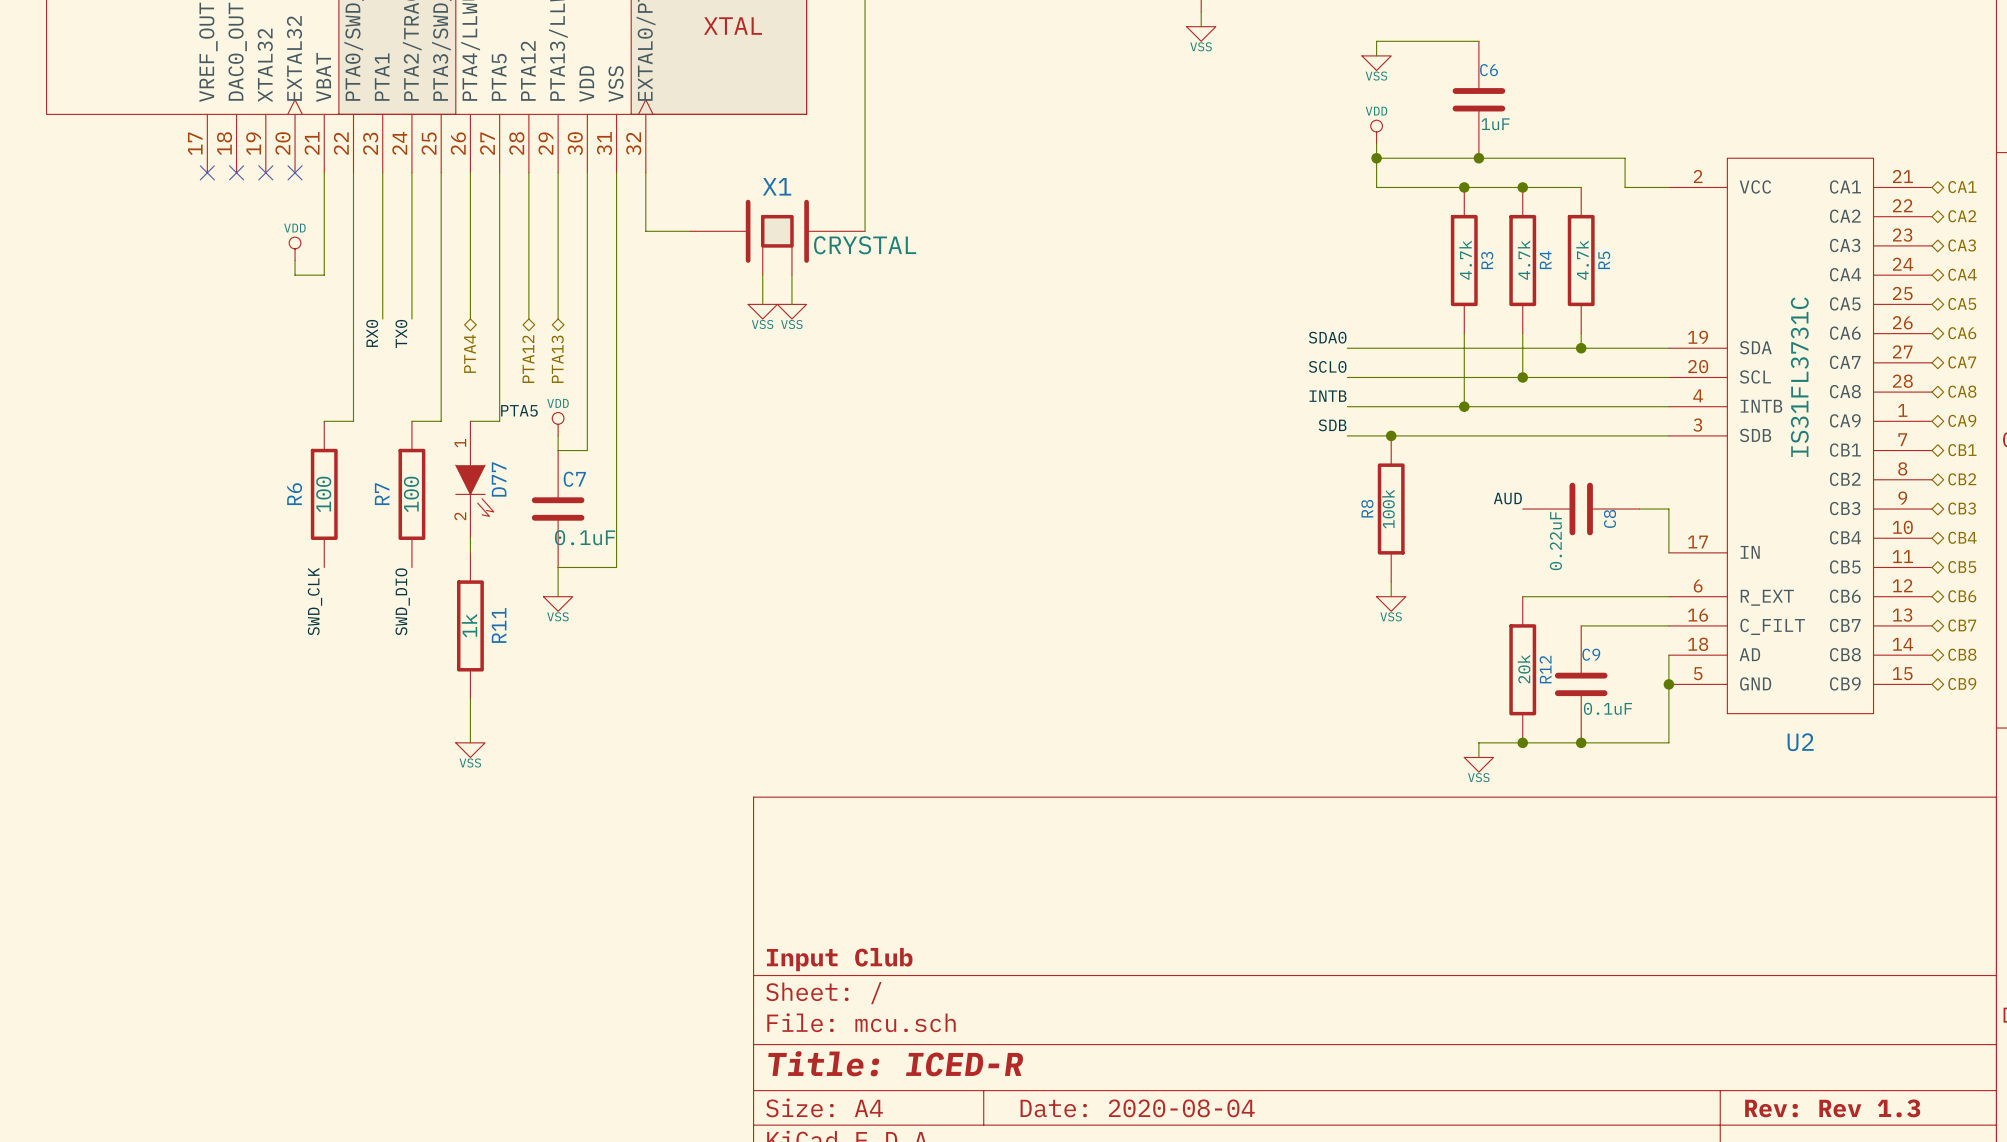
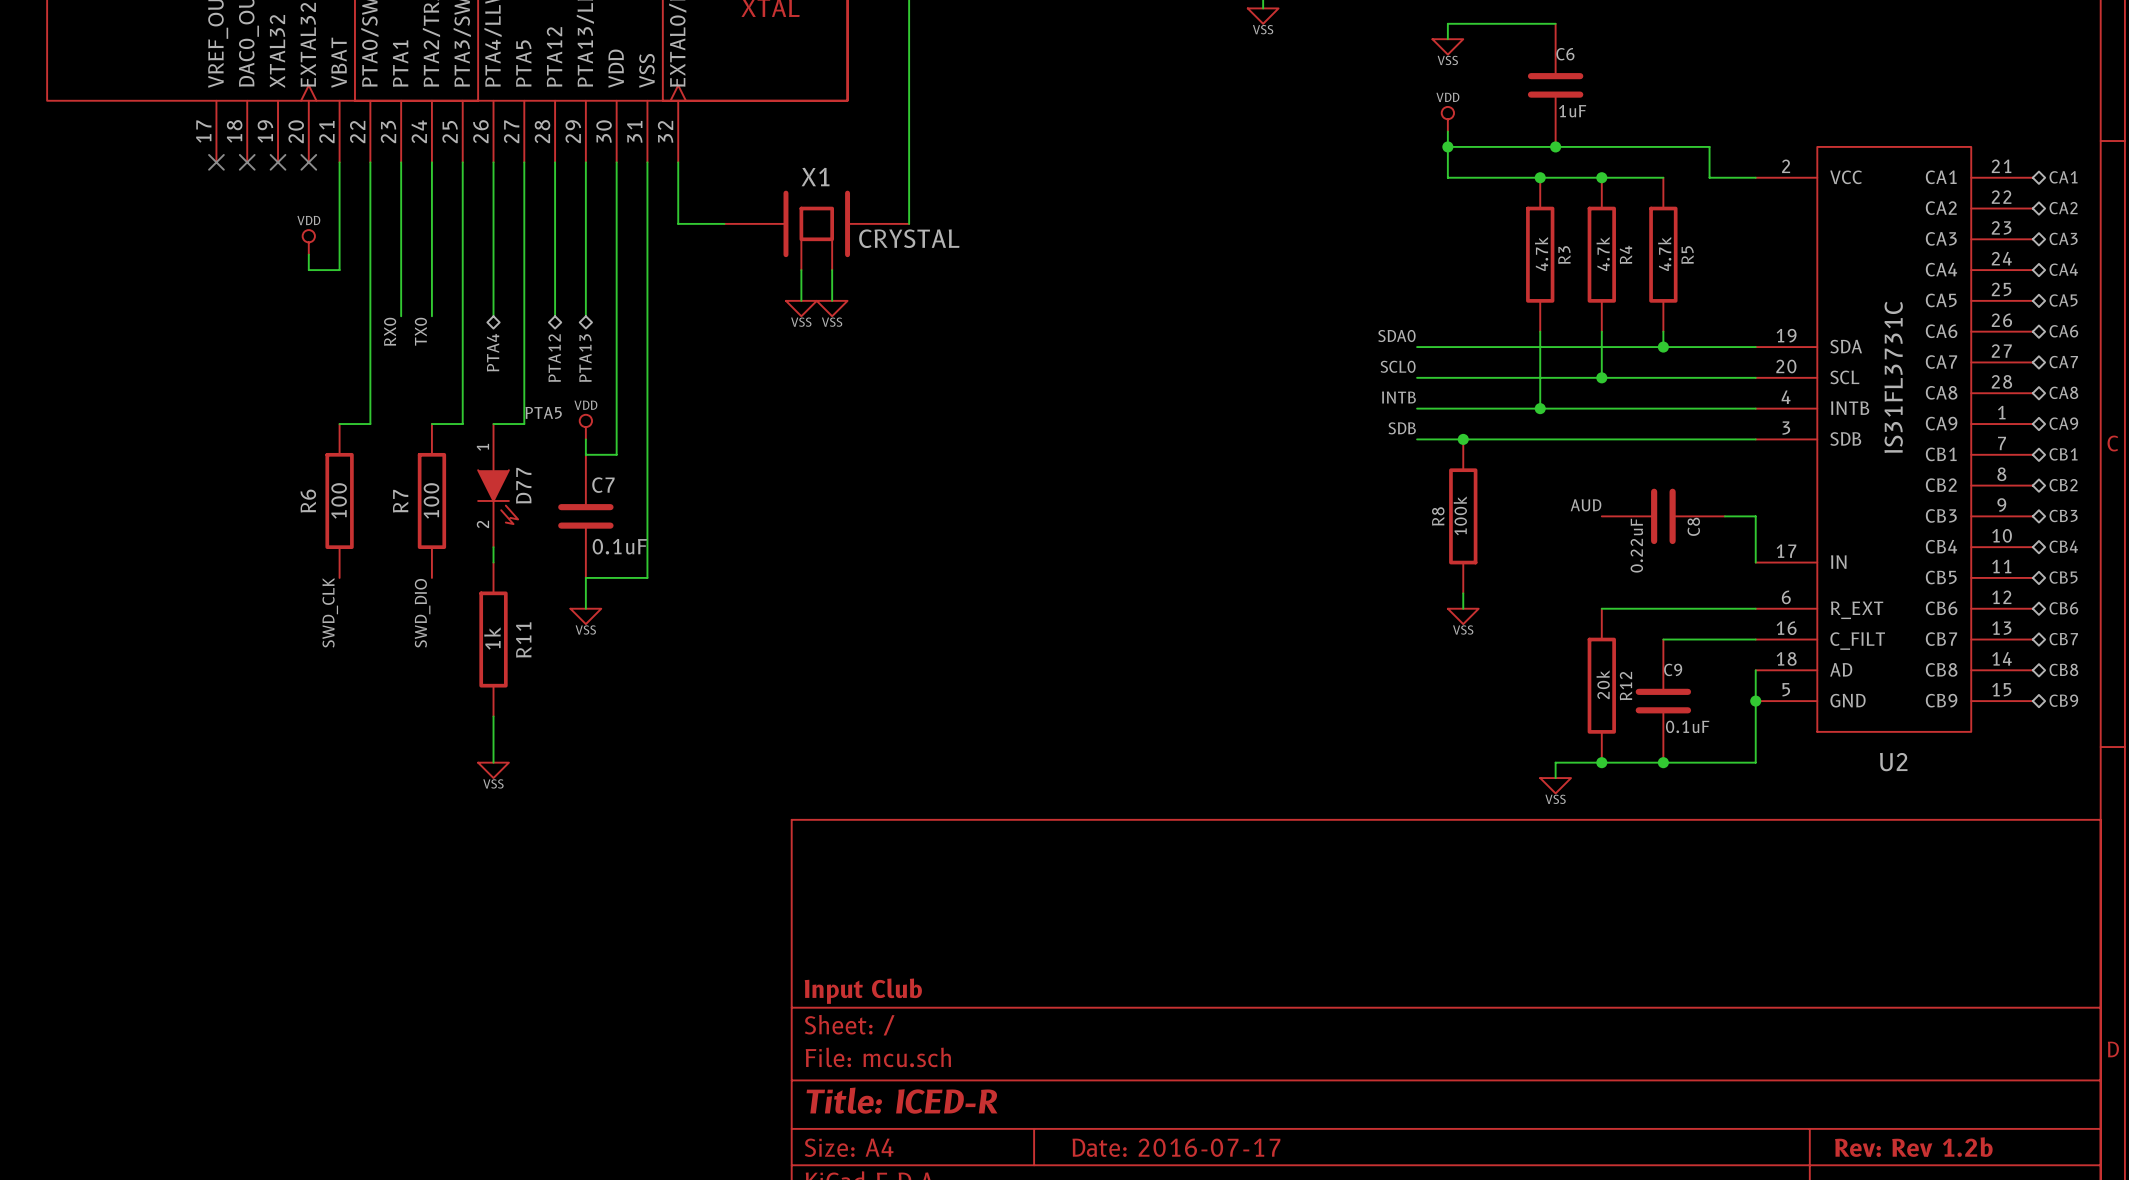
title block: Date: 2020-08-04 (1137, 1108) -> Date: 2016-07-17 (1176, 1147)
title block: Rev: Rev 1.3 (1832, 1108) -> Rev: Rev 1.2b (1913, 1147)

